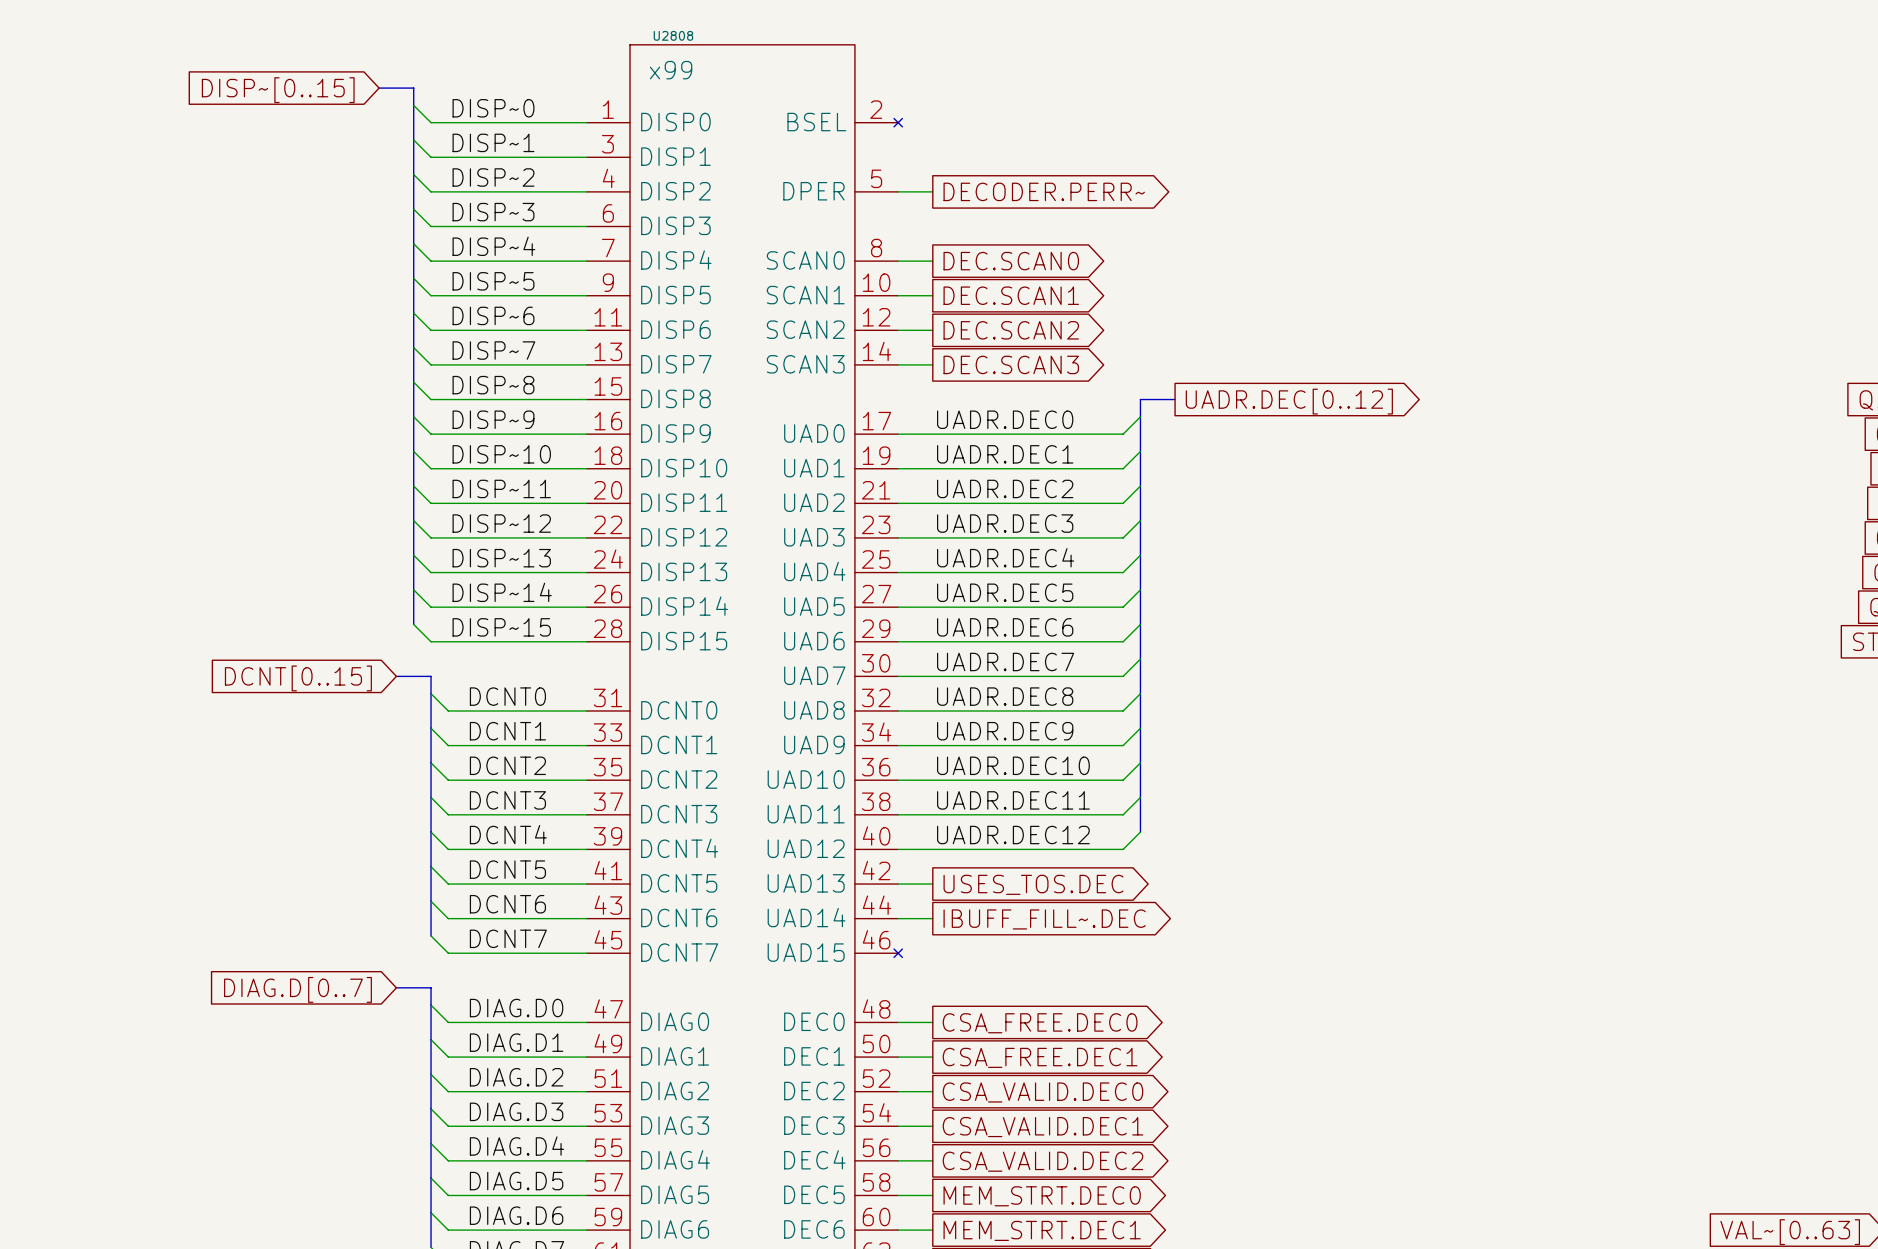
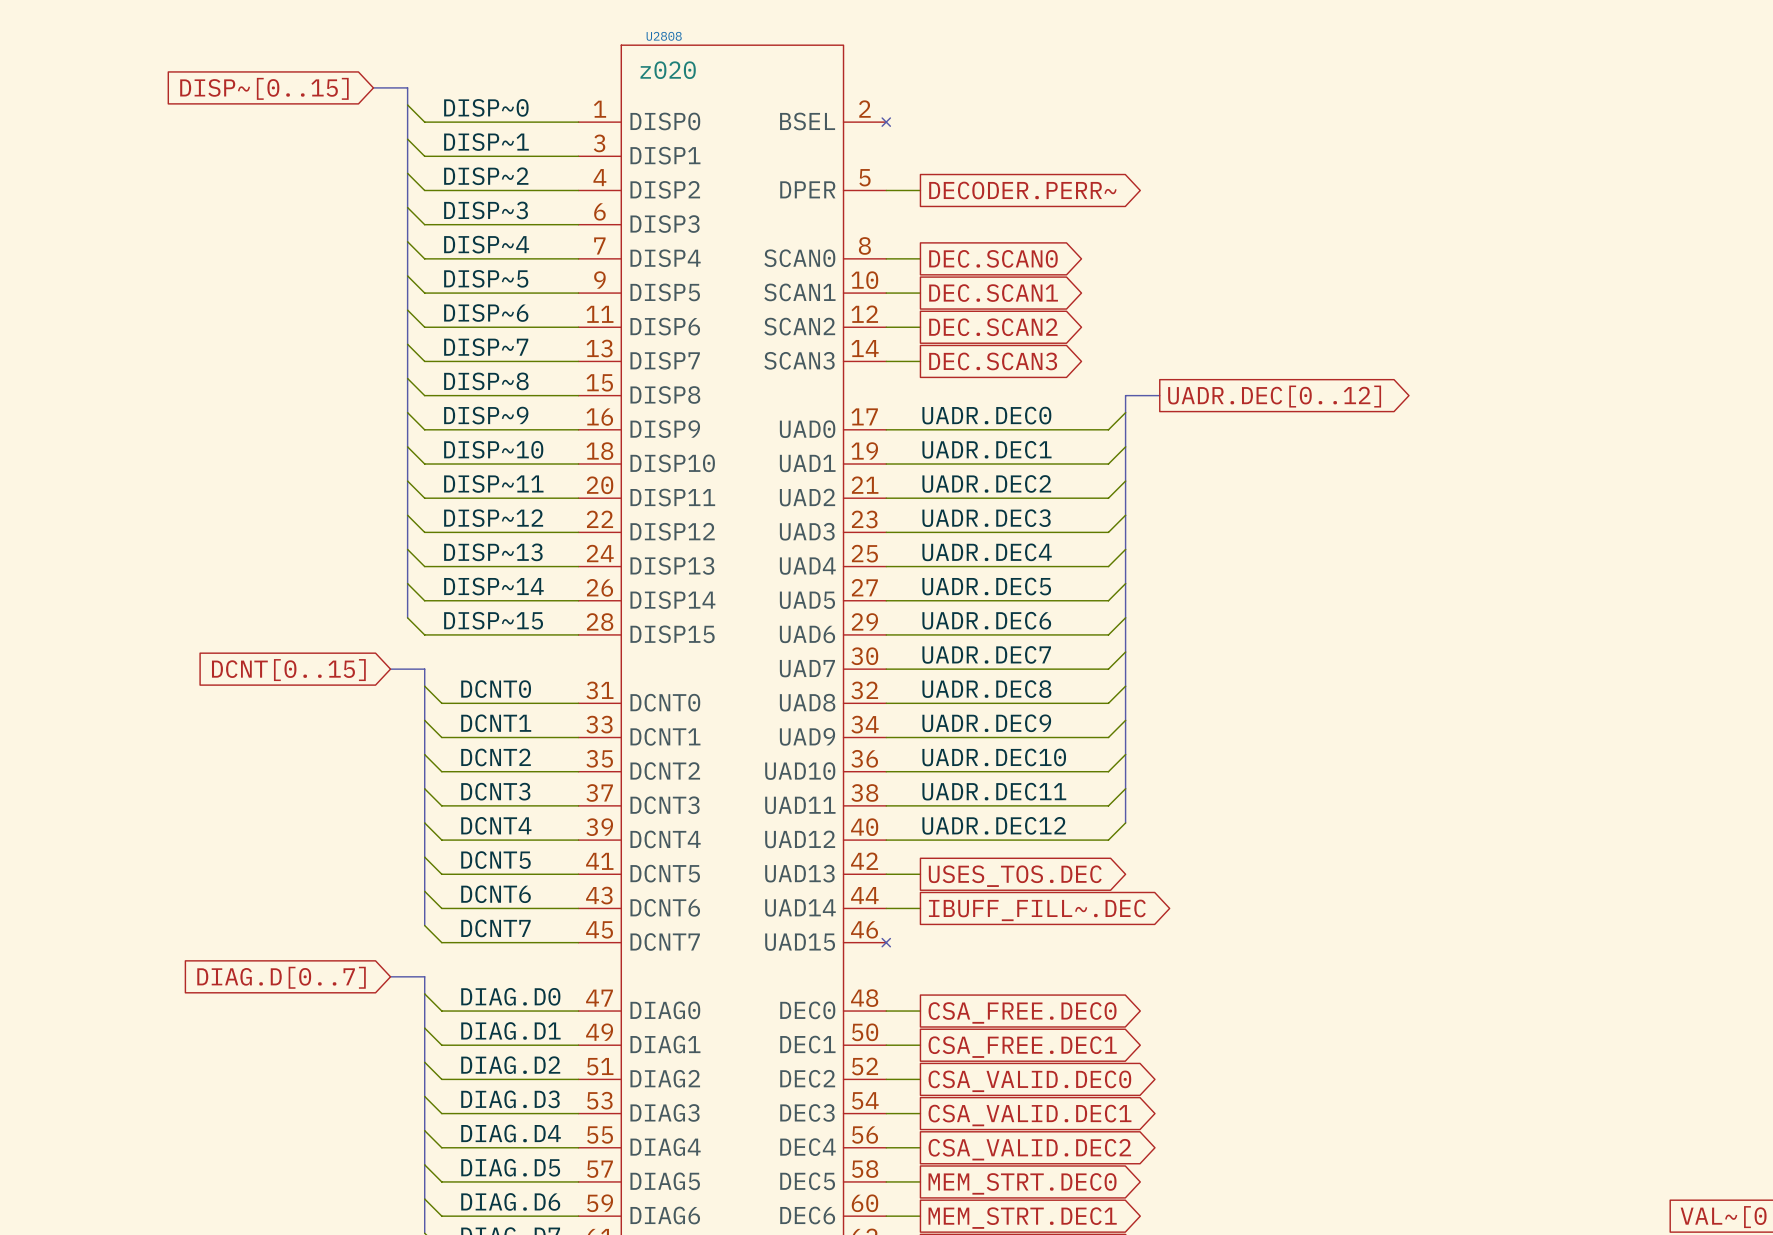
U2808 text: x99 (671, 70) -> z020 (668, 70)

